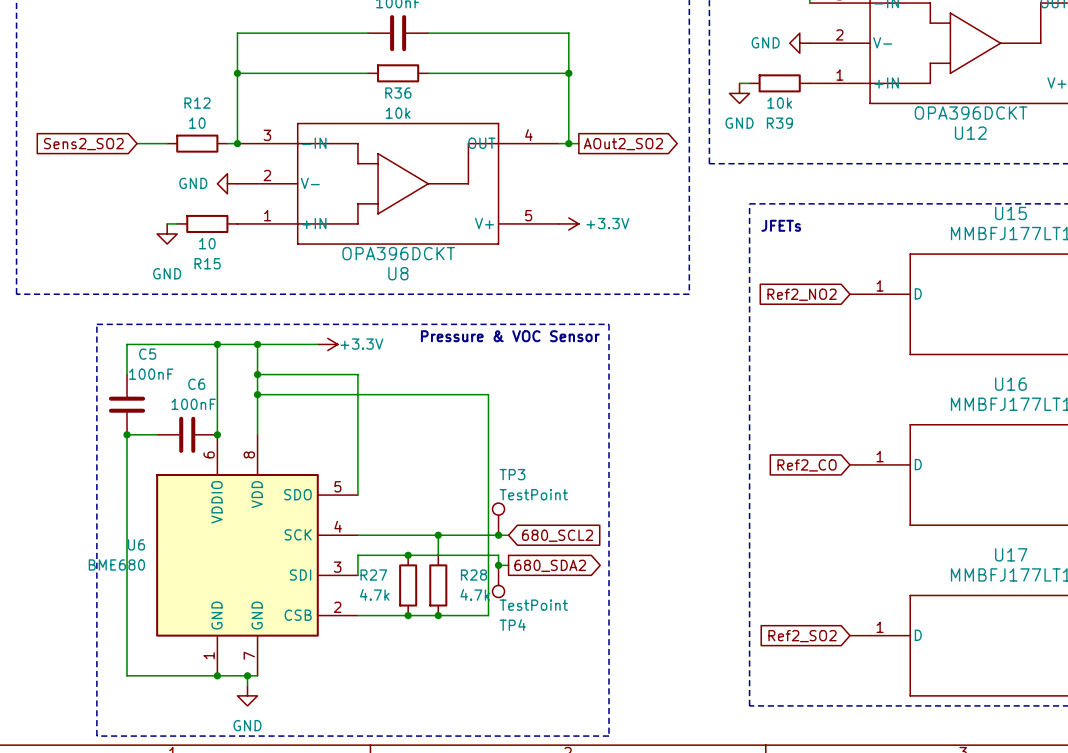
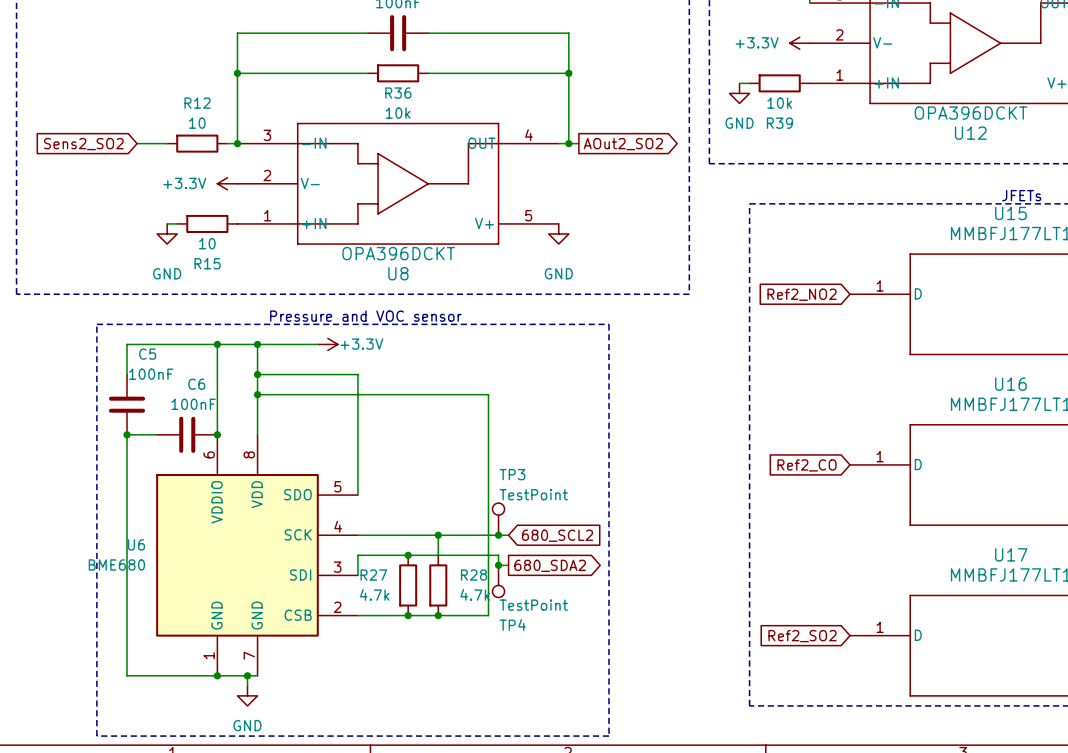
power symbol: GND (799, 43) -> +3.3V (799, 43)
power symbol: GND (227, 183) -> +3.3V (227, 183)
text: none -> JFETs (1021, 195)
power symbol: +3.3V (568, 223) -> none
text: JFETs (781, 225) -> none
power symbol: none -> GND (558, 233)
text: Pressure & VOC Sensor (510, 336) -> Pressure and VOC sensor (365, 316)

